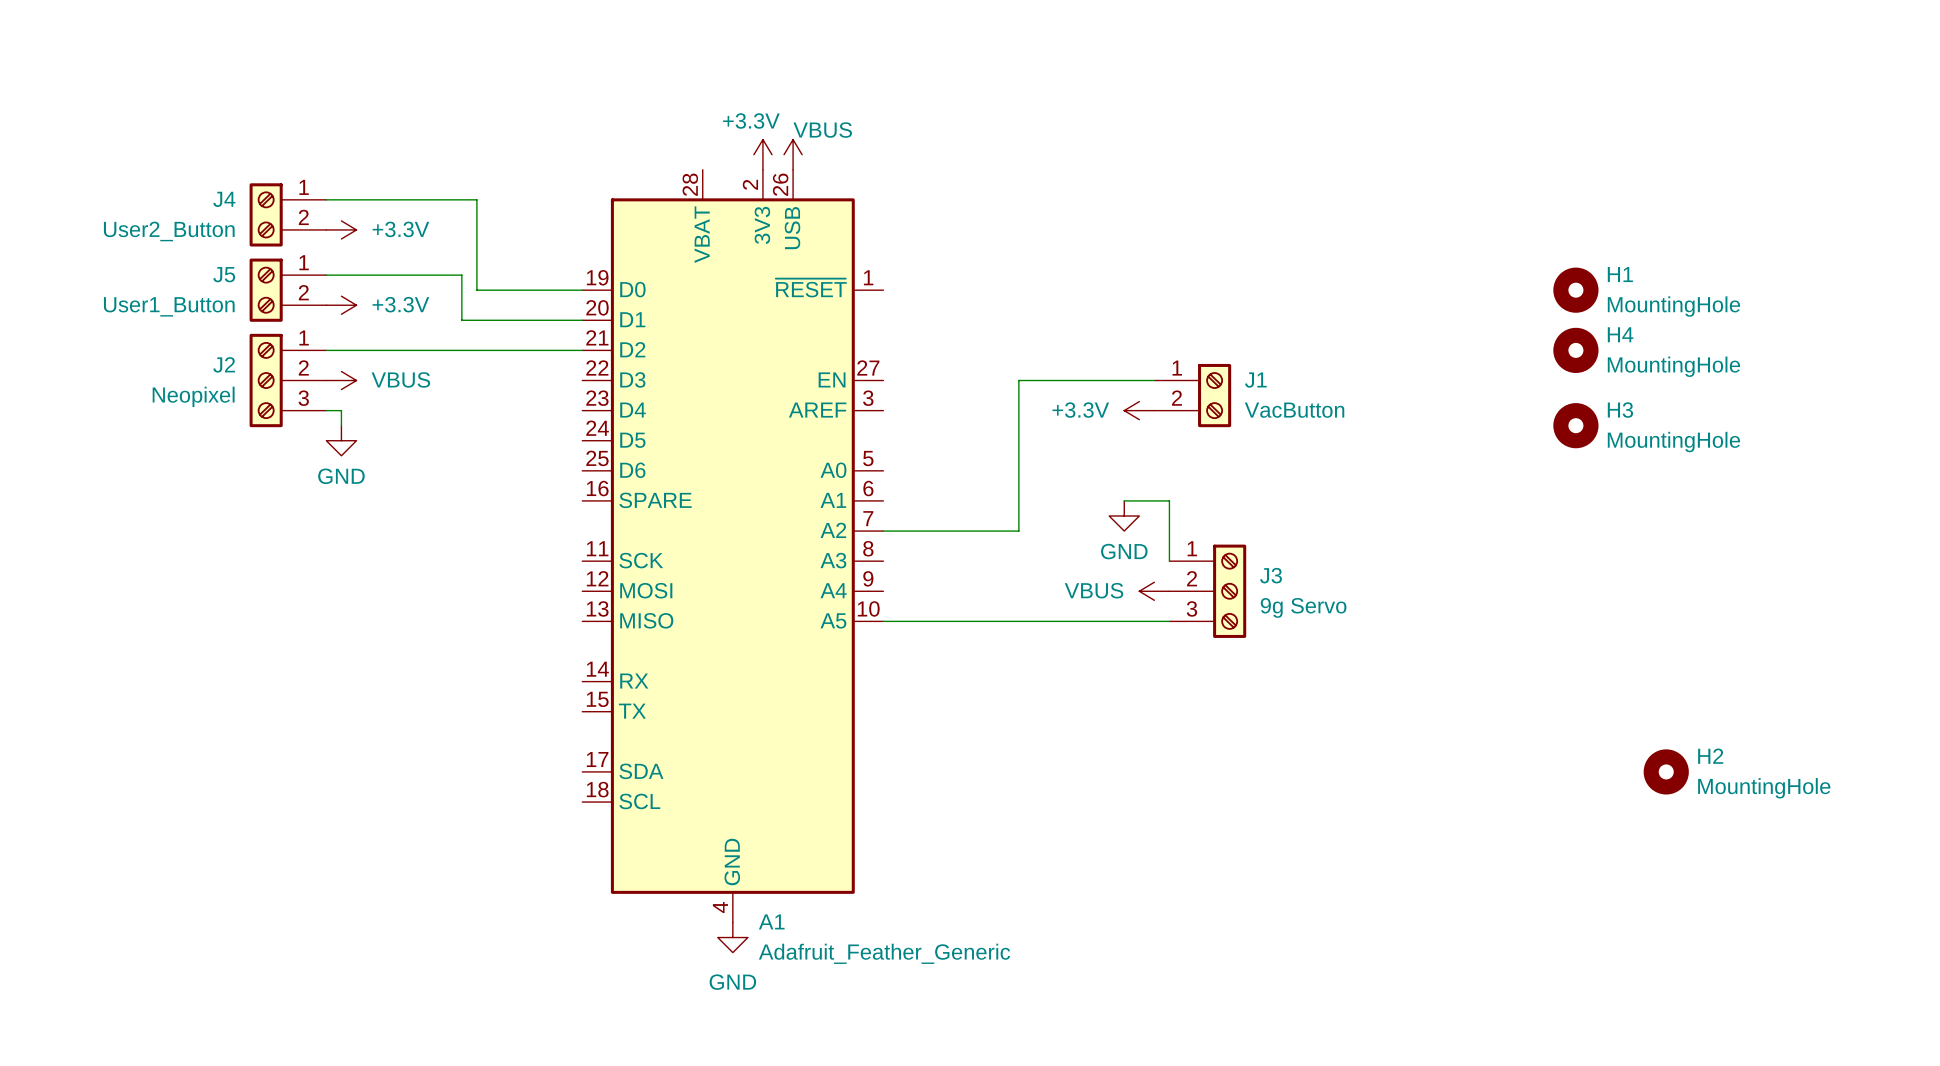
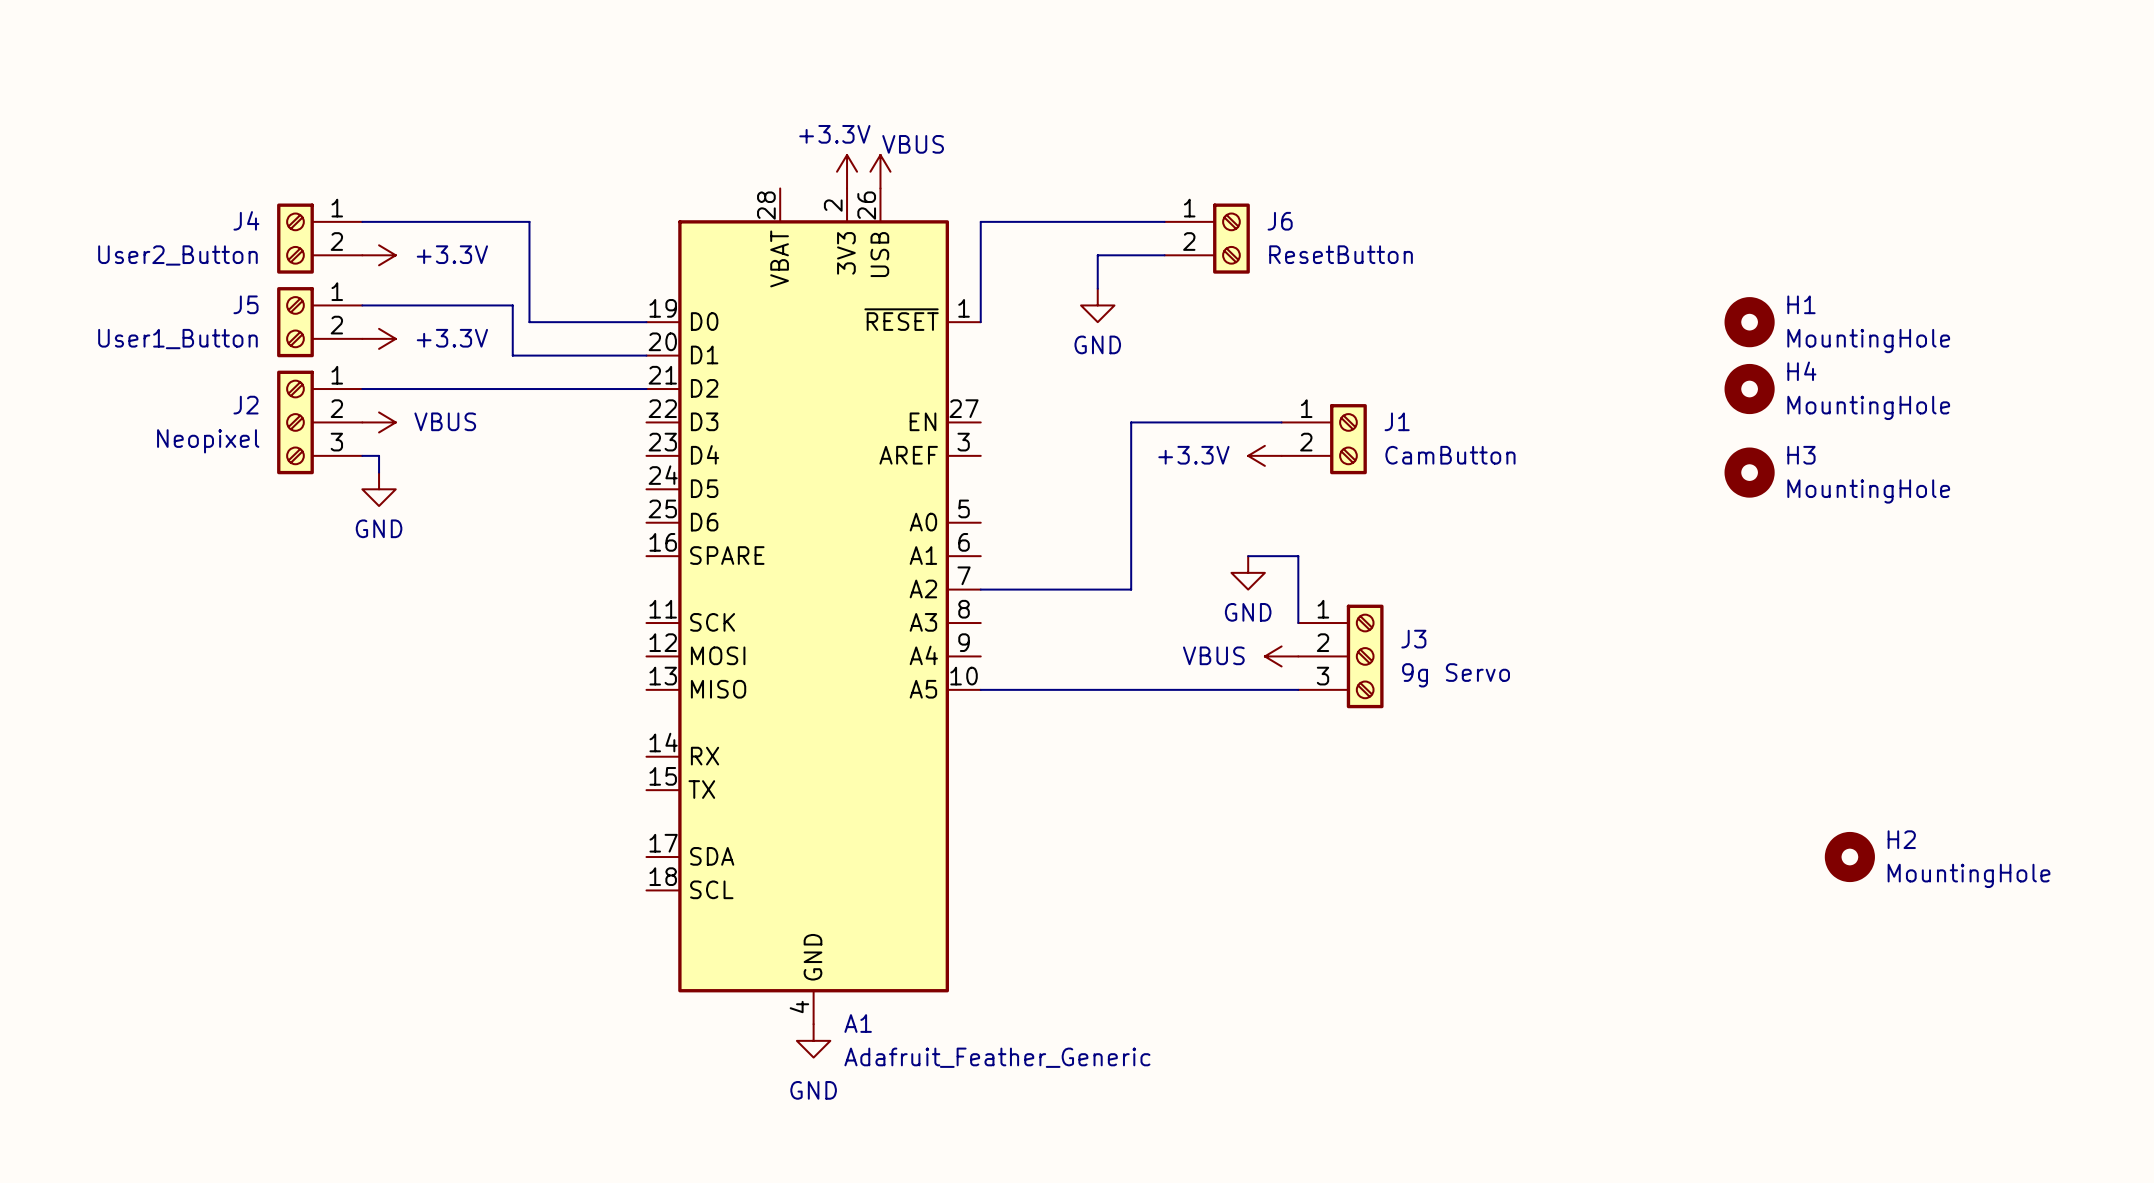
wire: none -> (1164, 221) (980, 221) (980, 322)
J6: none -> ResetButton (1207, 238)
wire: none -> (1164, 255) (1097, 255) (1097, 288)
power symbol: none -> GND (1097, 305)
J1 value: VacButton (1294, 410) -> CamButton (1450, 455)

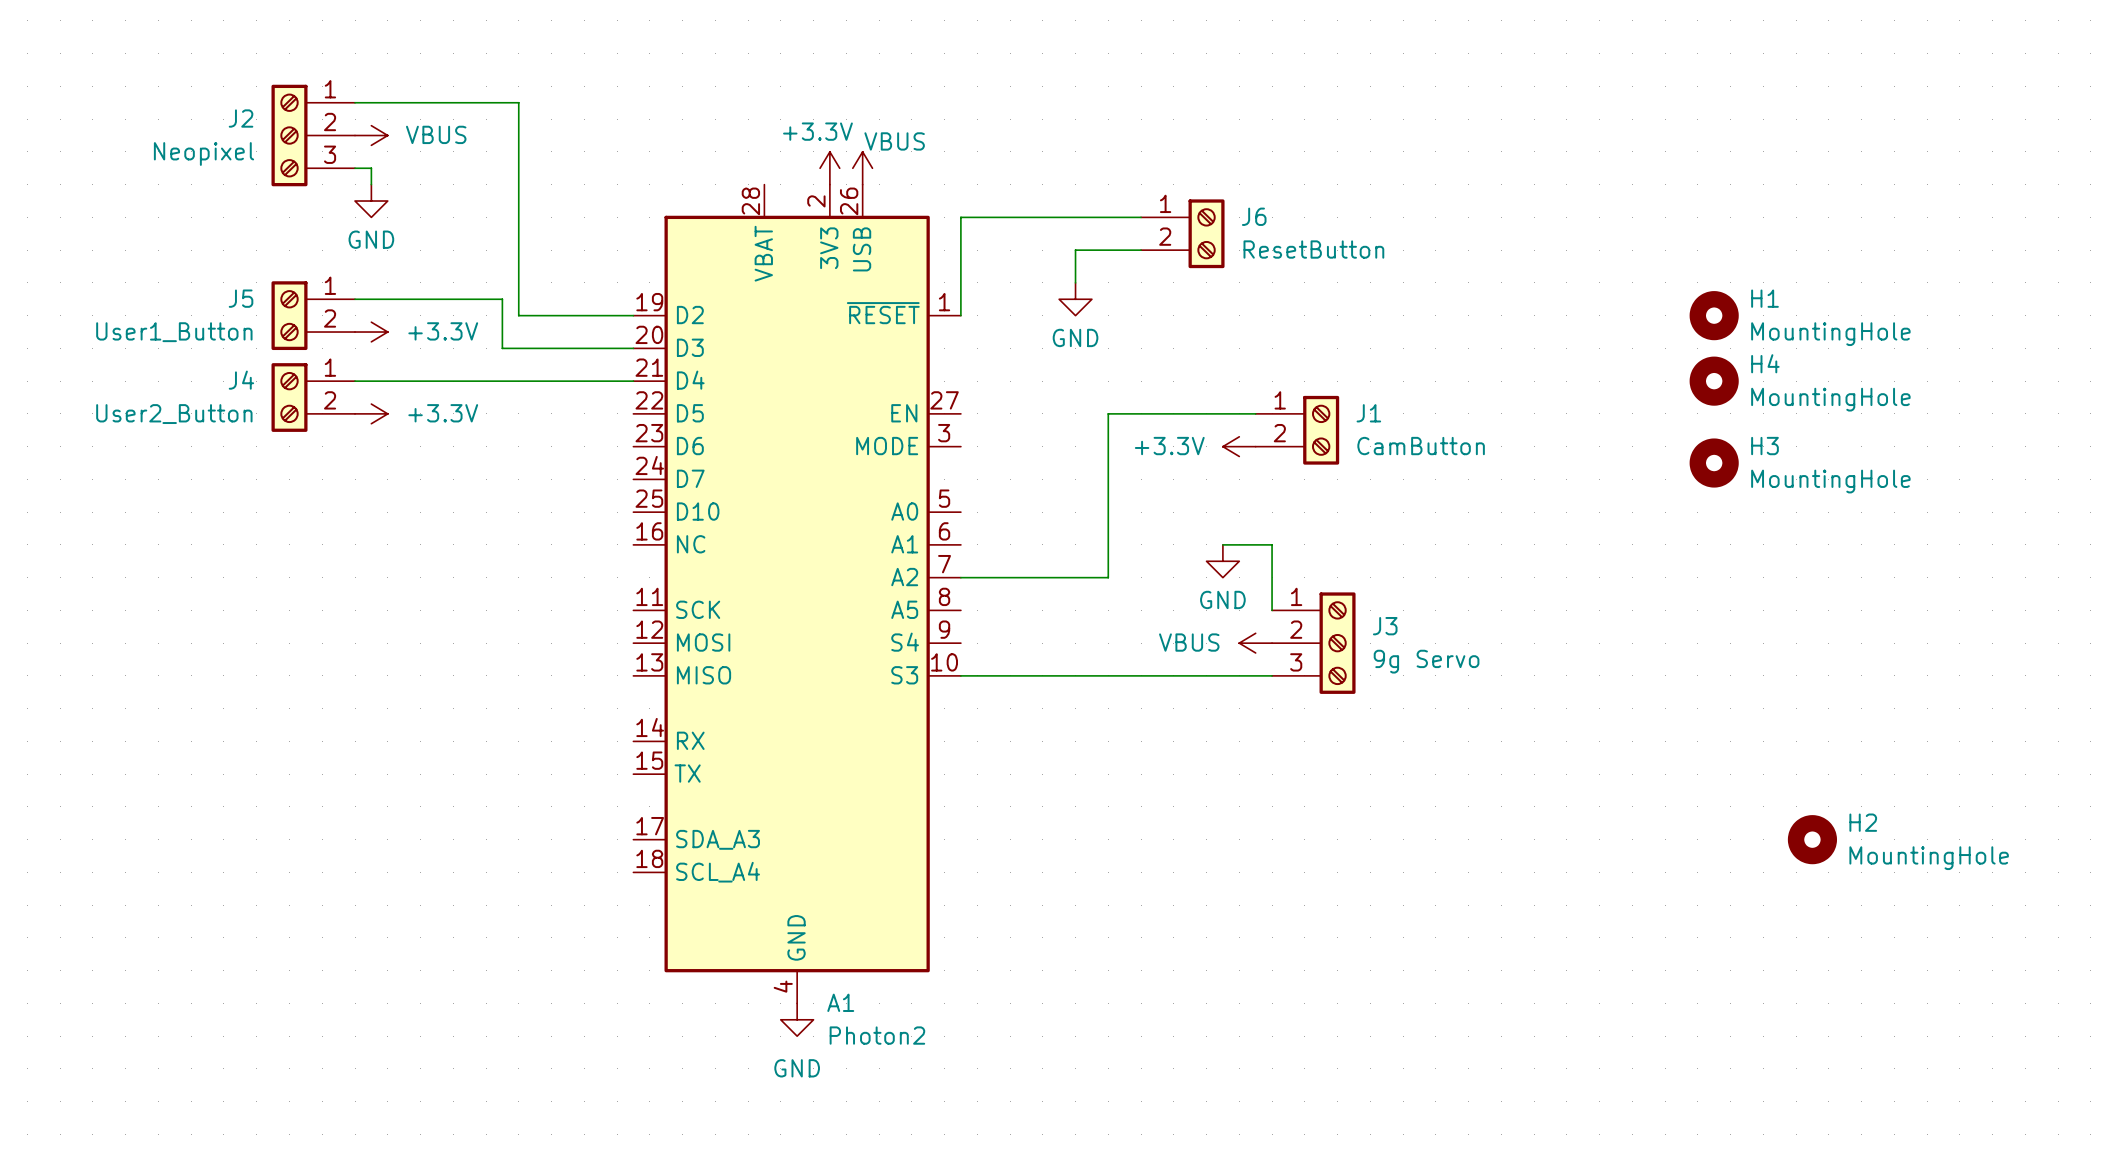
power symbol: none -> VBUS (371, 135)
A1 symbol: [646, 188, 981, 1025] -> [633, 184, 961, 1004]
wire: (362, 221) (529, 221) -> (355, 102) (518, 102) (518, 217)
J4 position: (319, 238) -> (313, 397)
power symbol: +3.3V (379, 255) -> none
J2 position: (319, 422) -> (313, 135)
power symbol: VBUS (379, 422) -> +3.3V (371, 413)
wire: (362, 455) (379, 455) (379, 472) -> (355, 168) (371, 168) (371, 184)
power symbol position: GND (379, 489) -> GND (371, 201)
A1 value: Adafruit_Feather_Generic (997, 1057) -> Photon2 (877, 1035)

